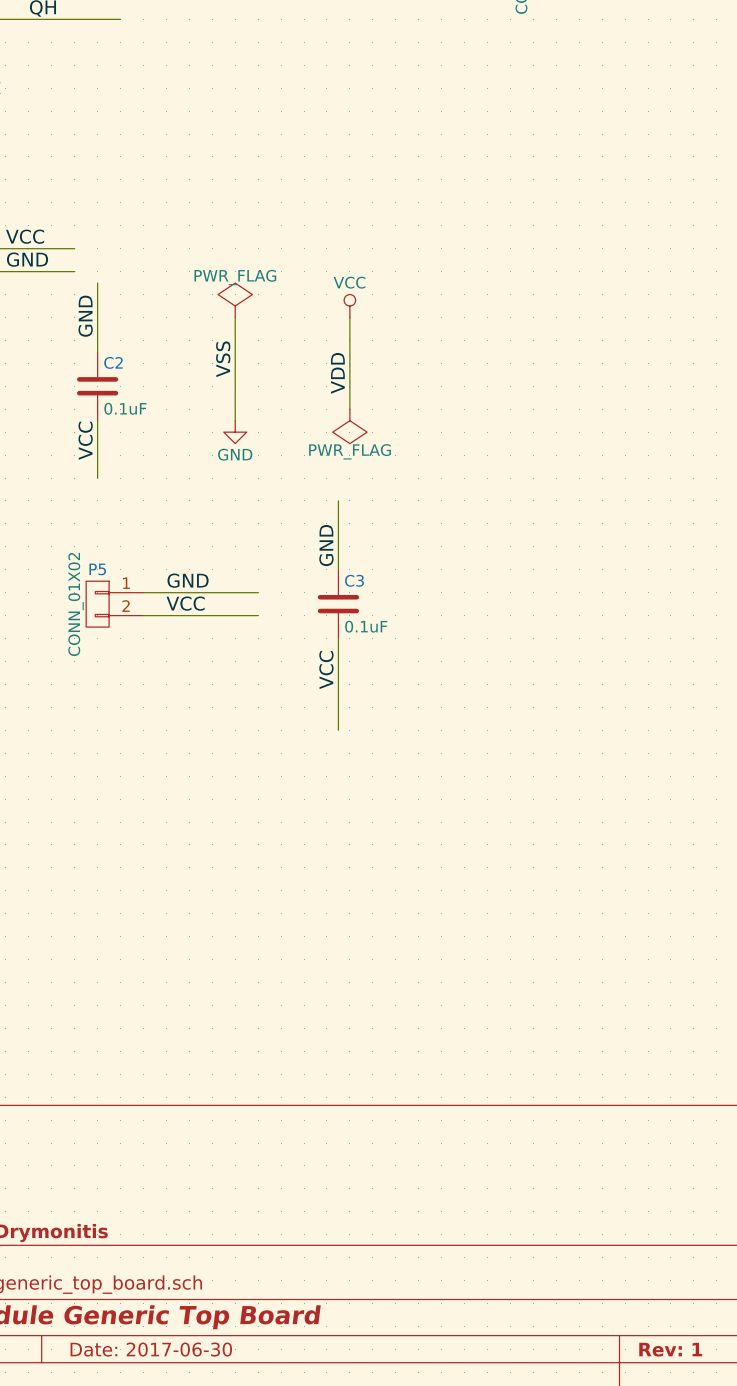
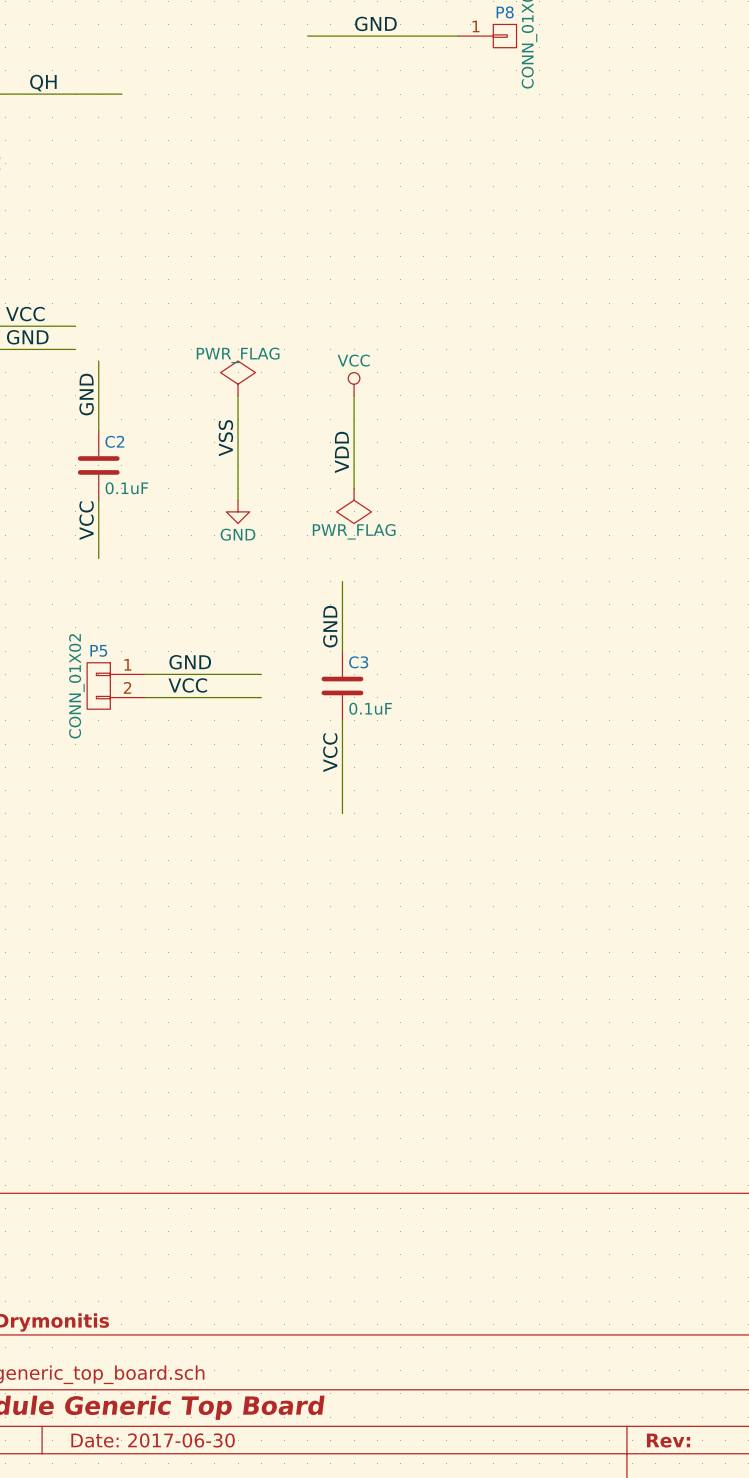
title block: Rev: 1 (670, 1349) -> Rev: (668, 1440)

